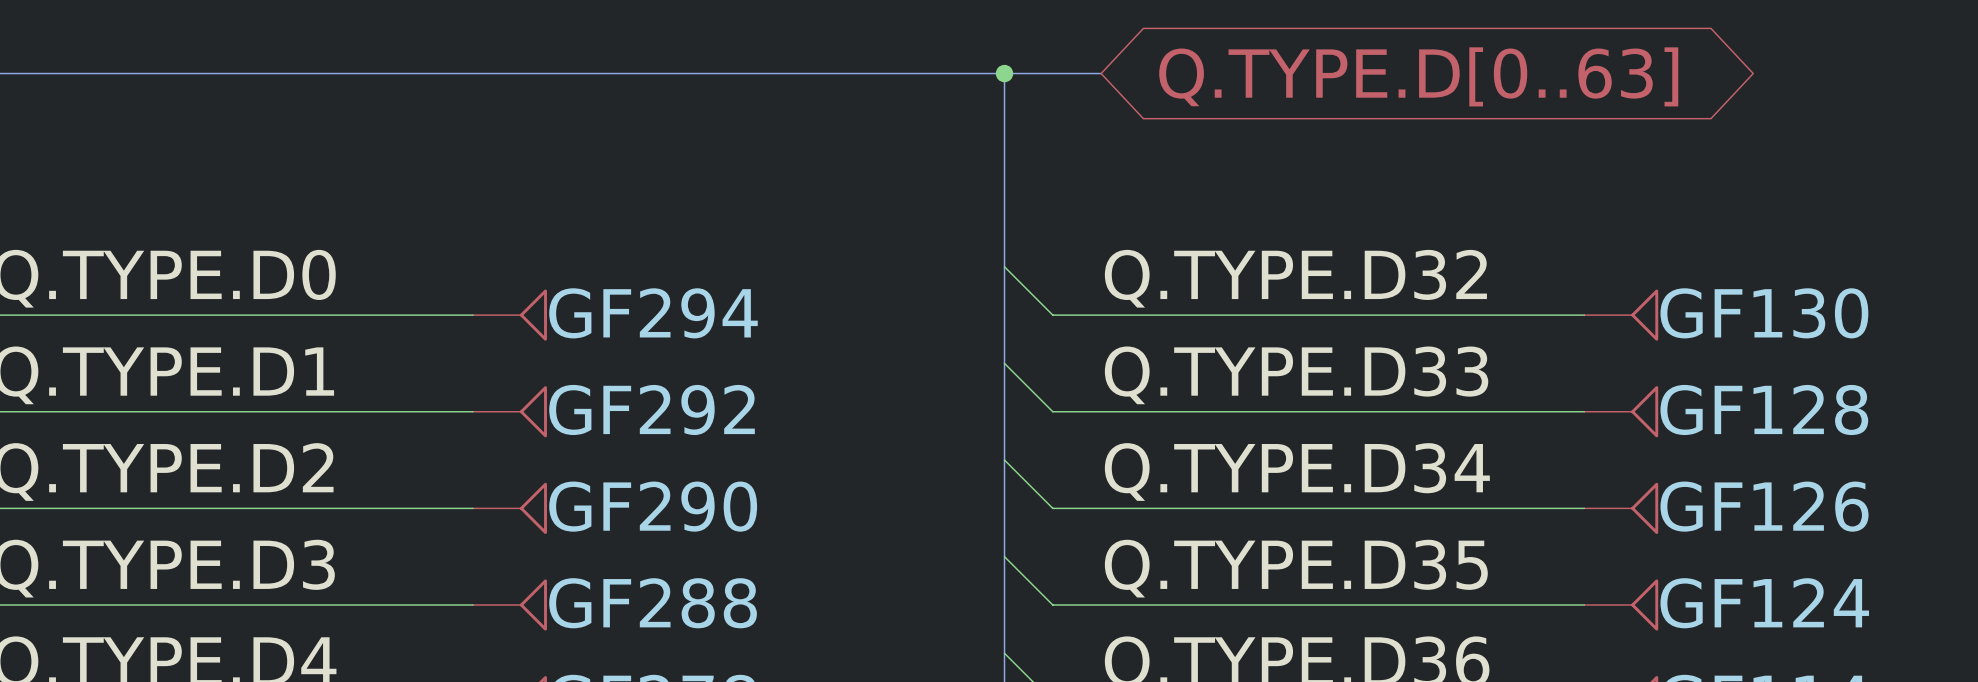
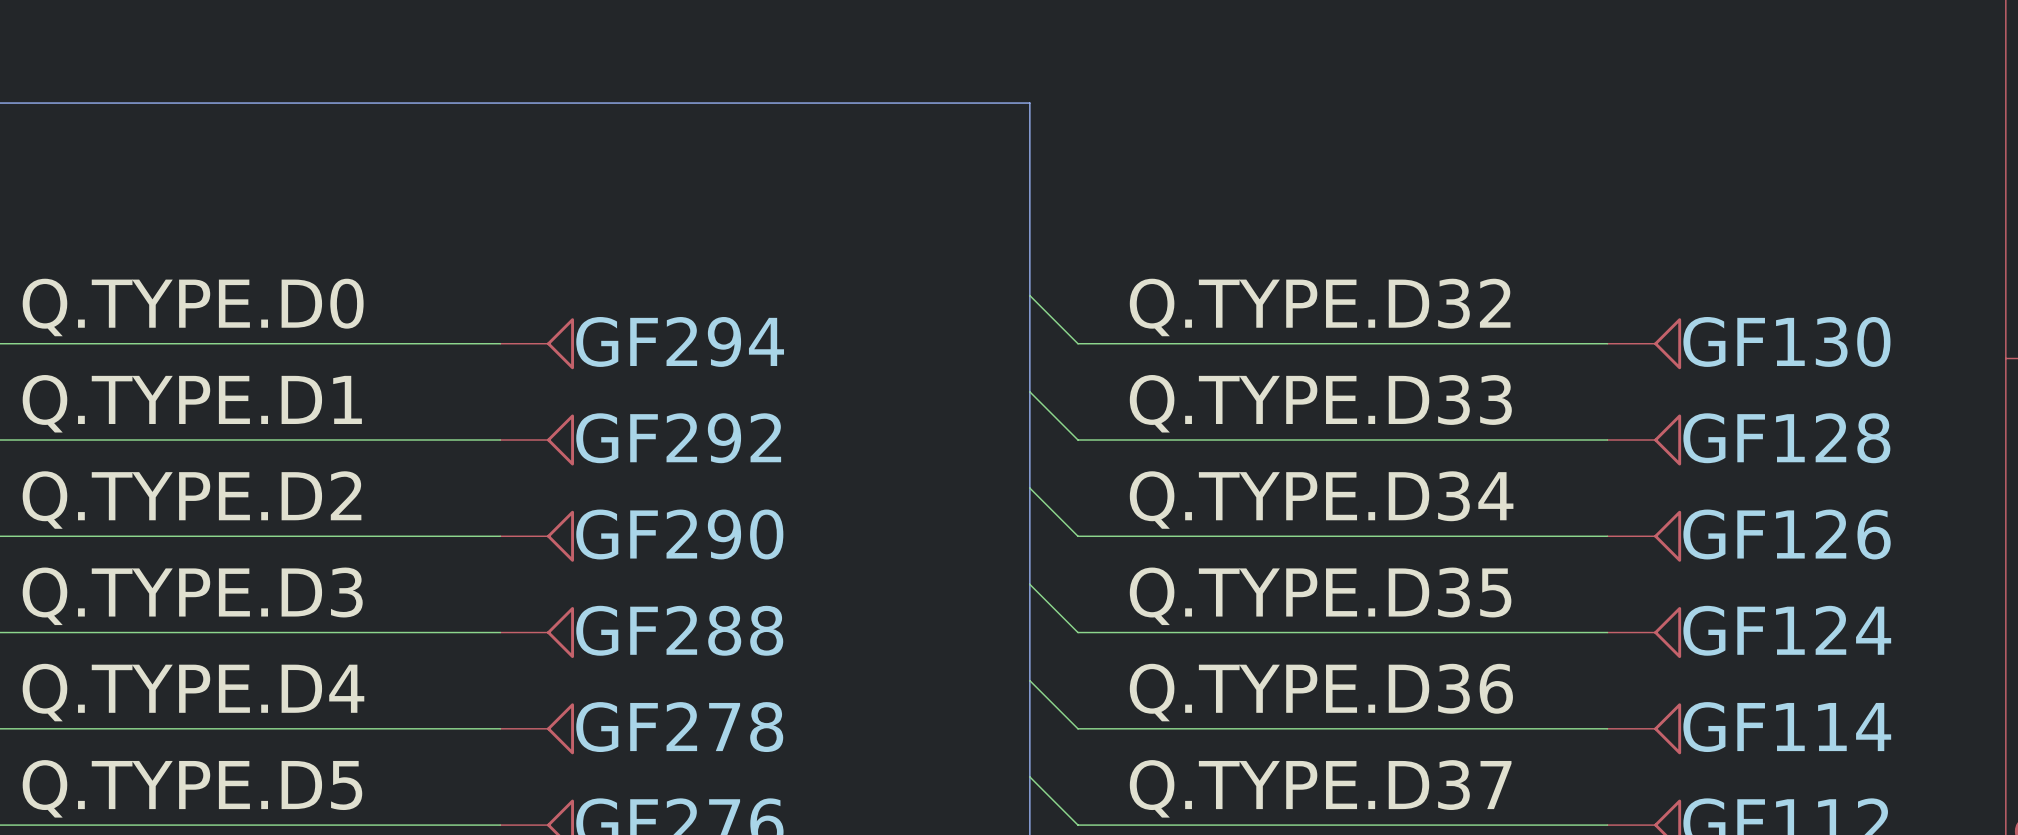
bus: (1004, 73) (1101, 73) -> none
junction: (1004, 73) -> none
global label: Q.TYPE.D[0..63] (1418, 76) -> none

